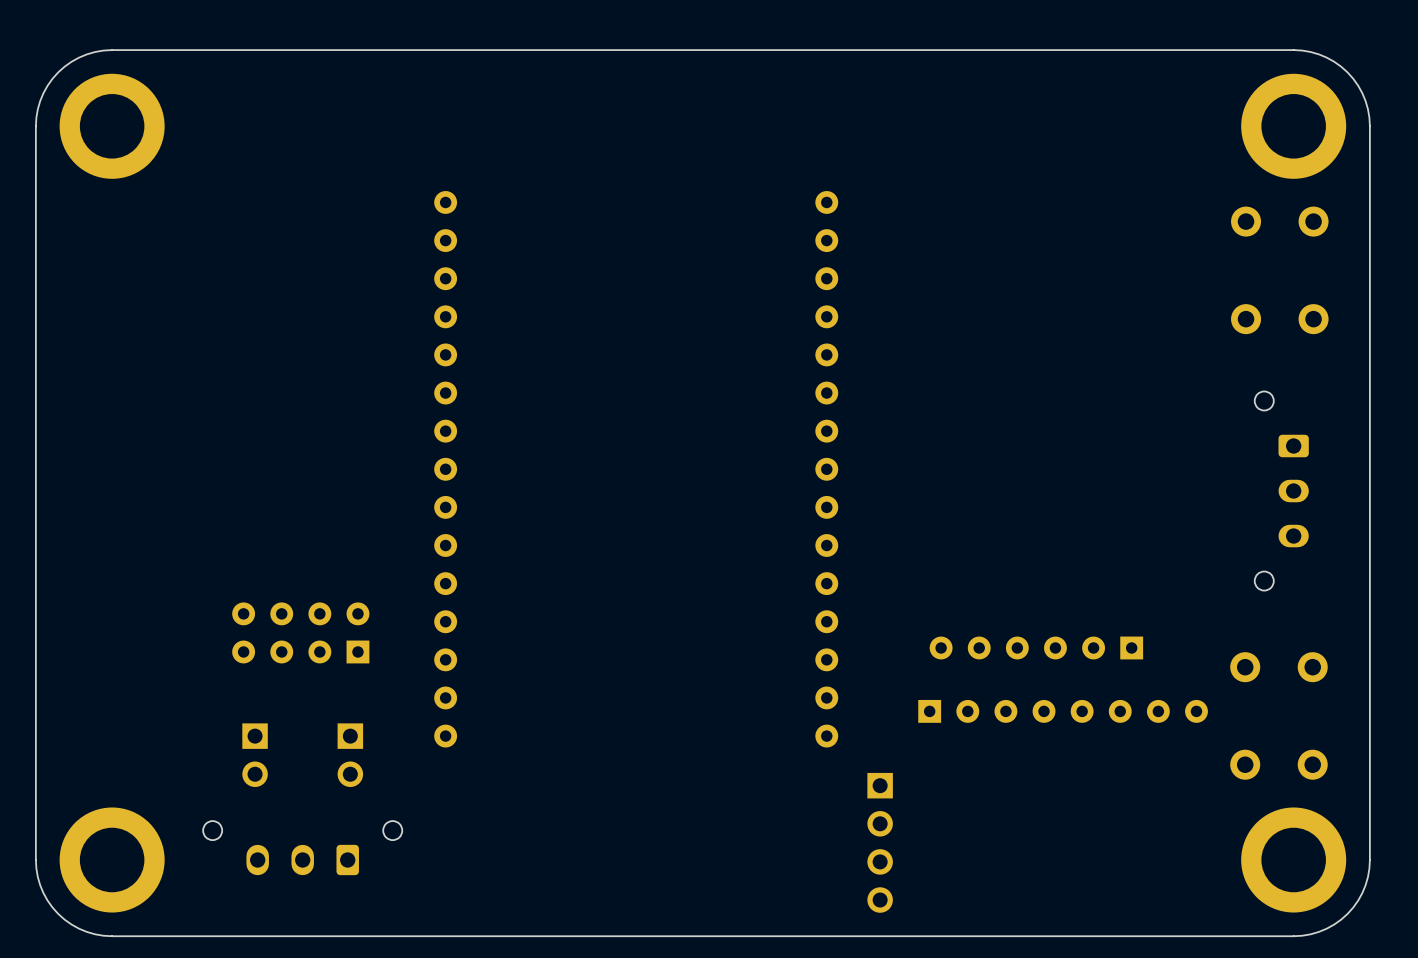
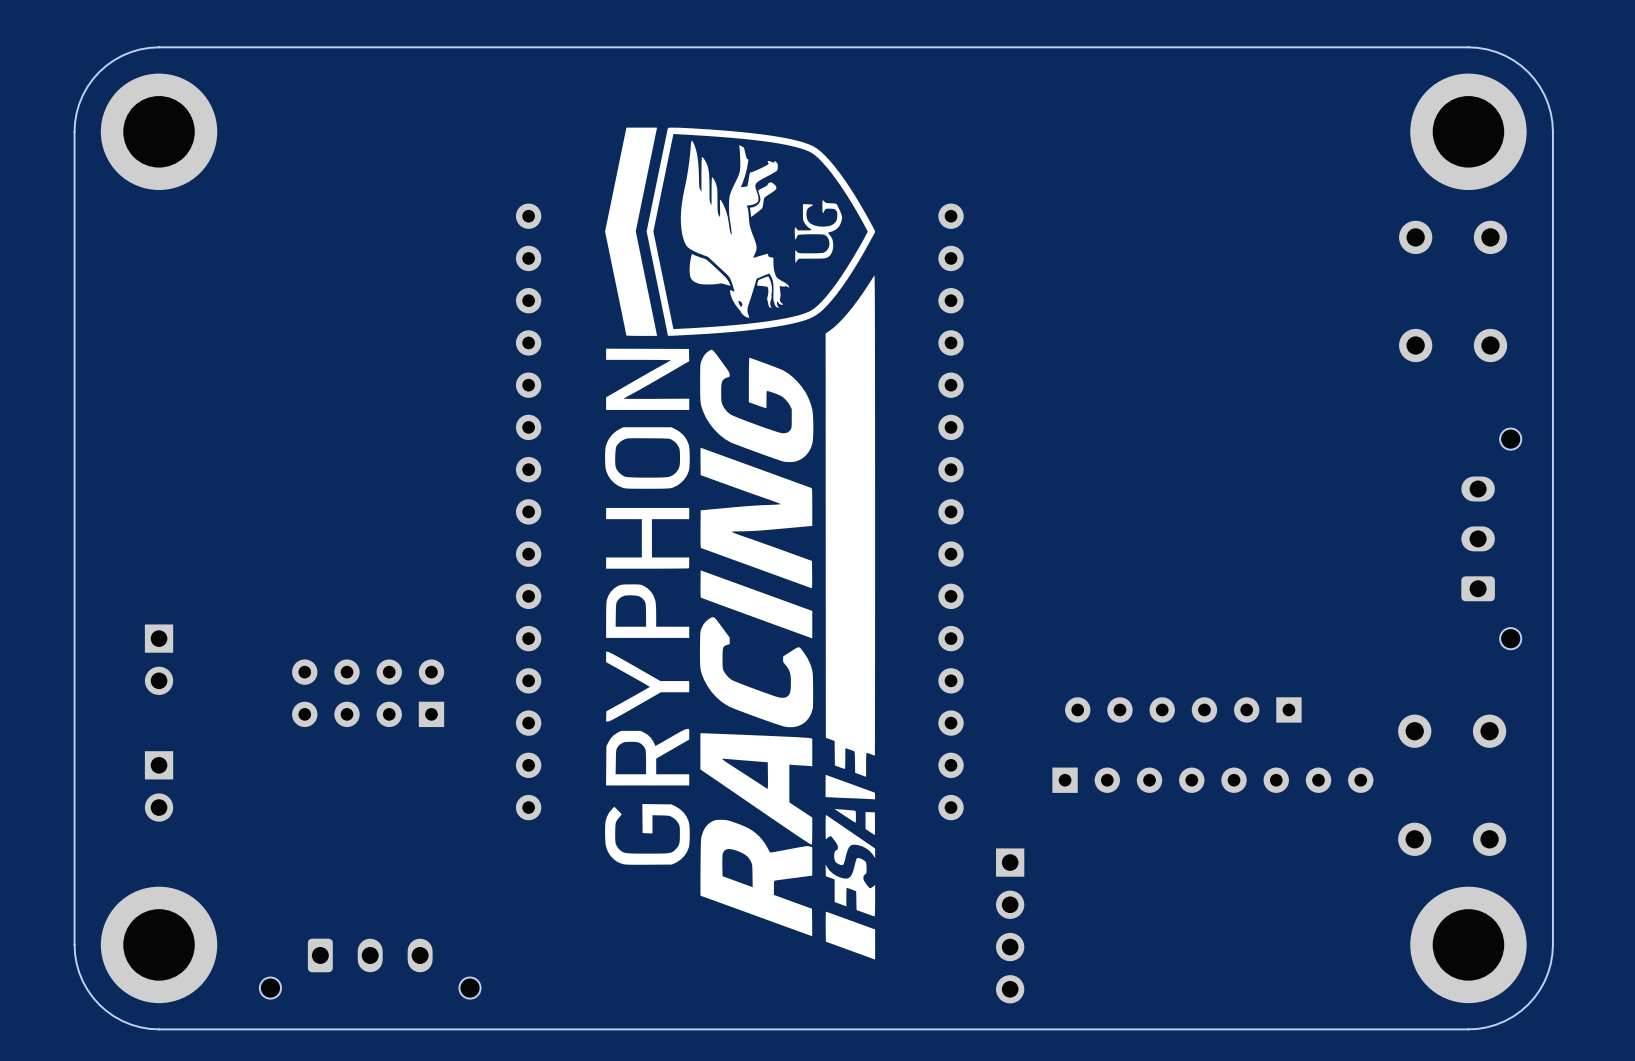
drawing: none -> [605, 127, 876, 960]
part rotation: 0° (1281, 491) -> 180° (1491, 538)
part: none -> (159, 659)
part: none -> (159, 786)
part: (255, 755) -> none
part: (350, 755) -> none
part rotation: 0° (302, 848) -> 180° (370, 968)

